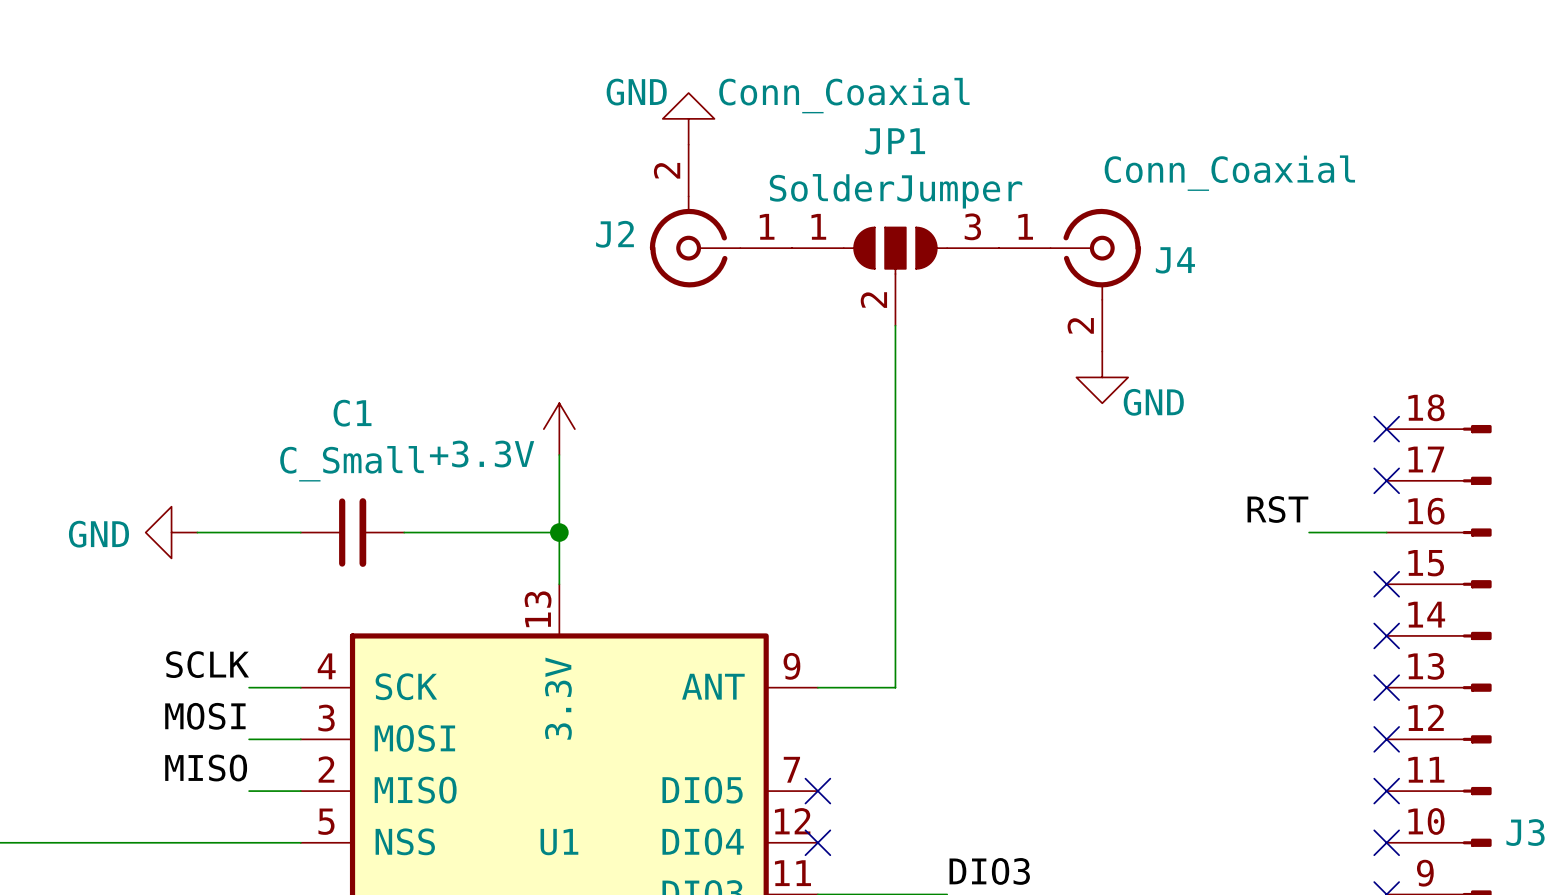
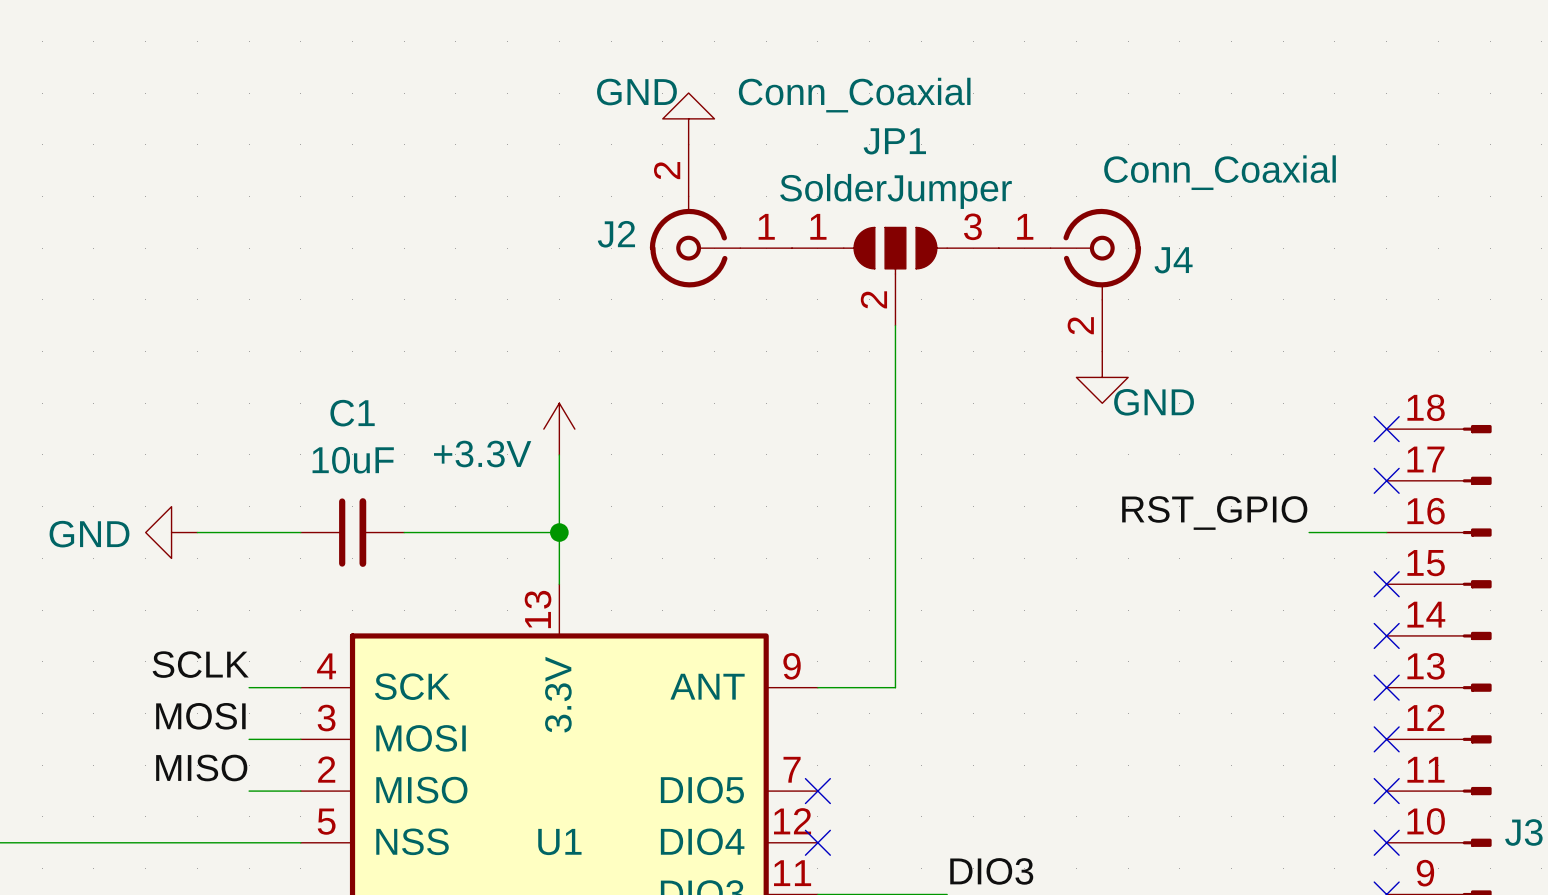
C1 value: C_Small (352, 463) -> 10uF (353, 460)
label: RST (1277, 509) -> RST_GPIO (1214, 513)

